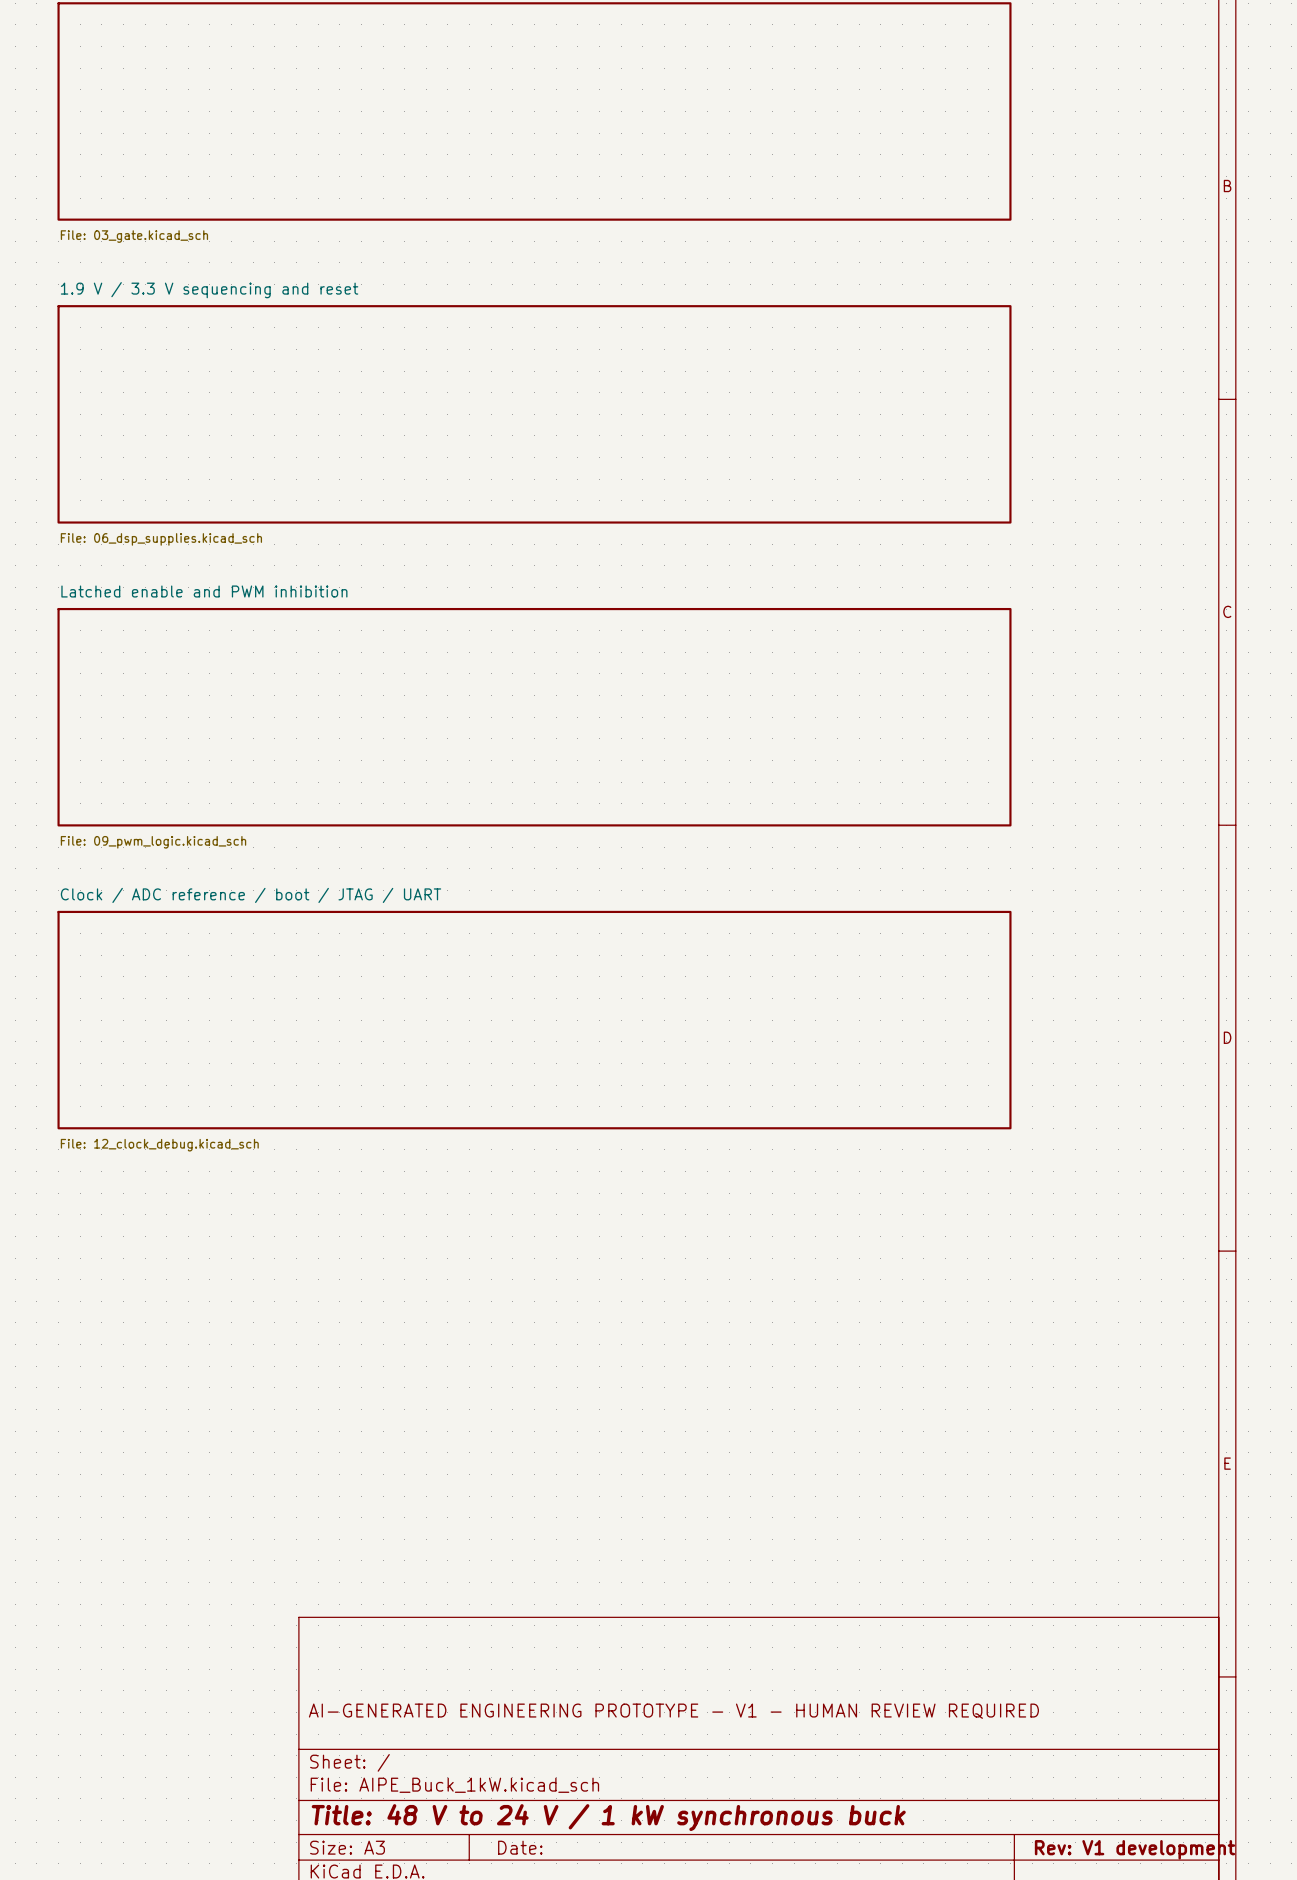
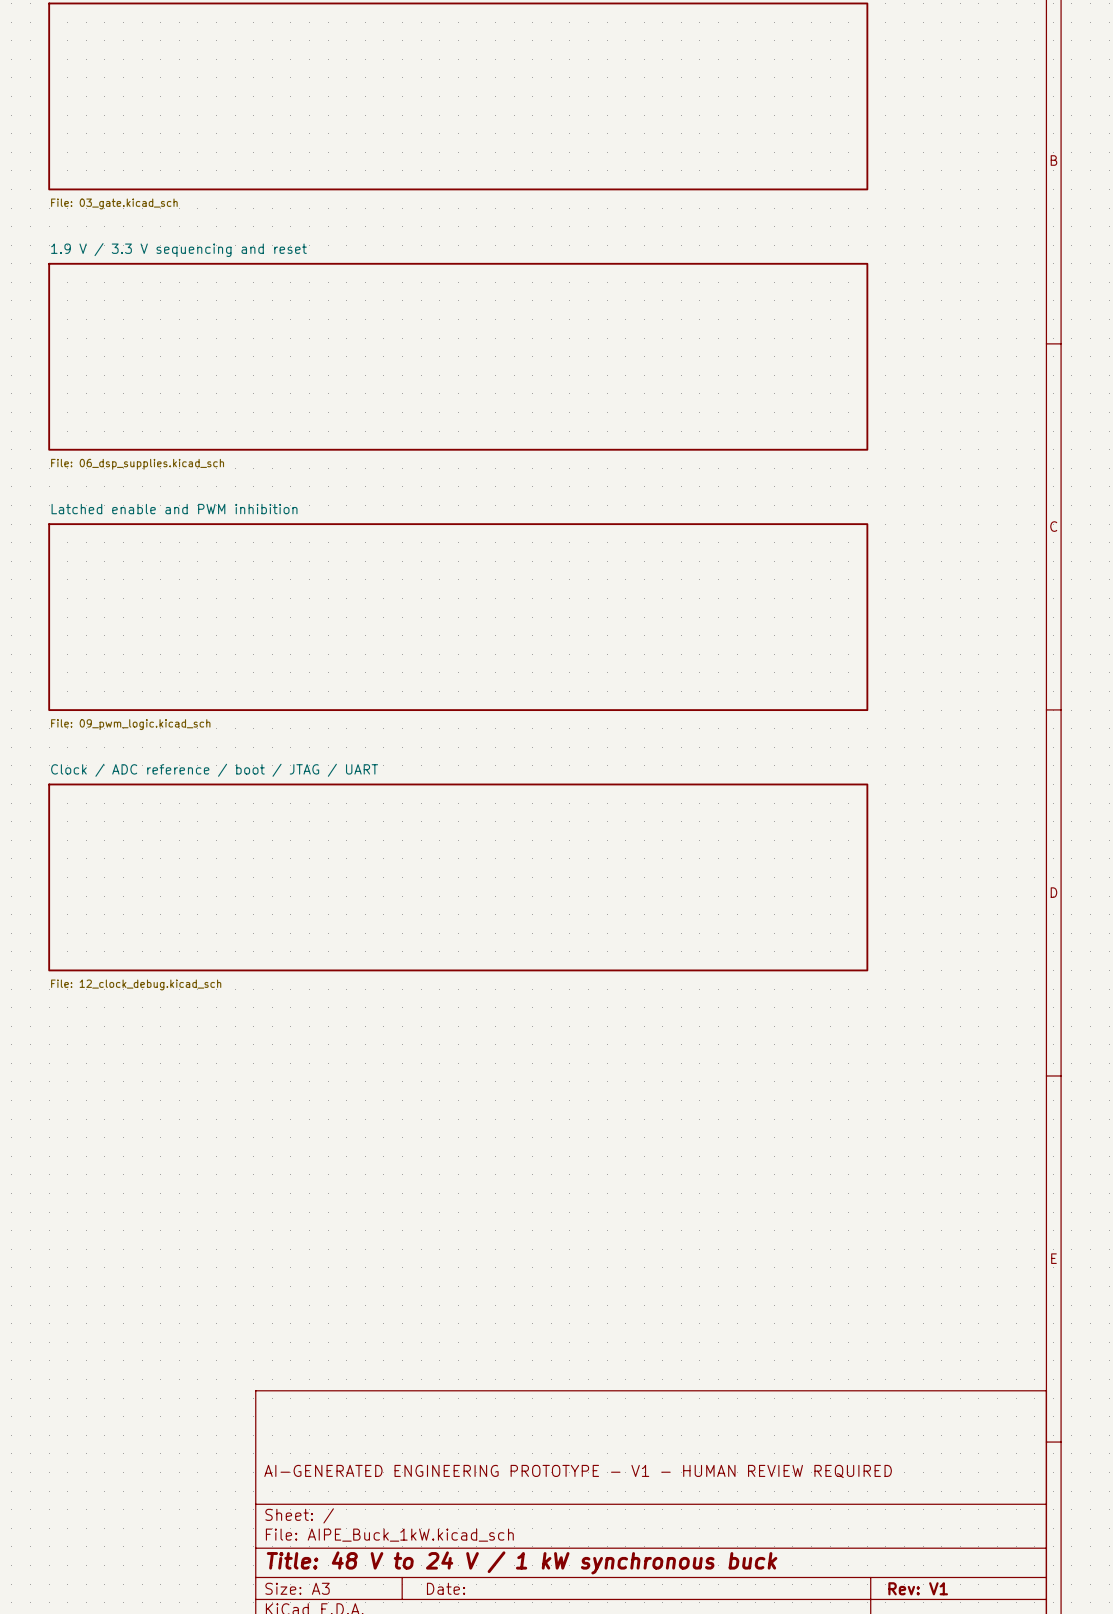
title block: Rev: V1 development (1134, 1849) -> Rev: V1 (918, 1588)

